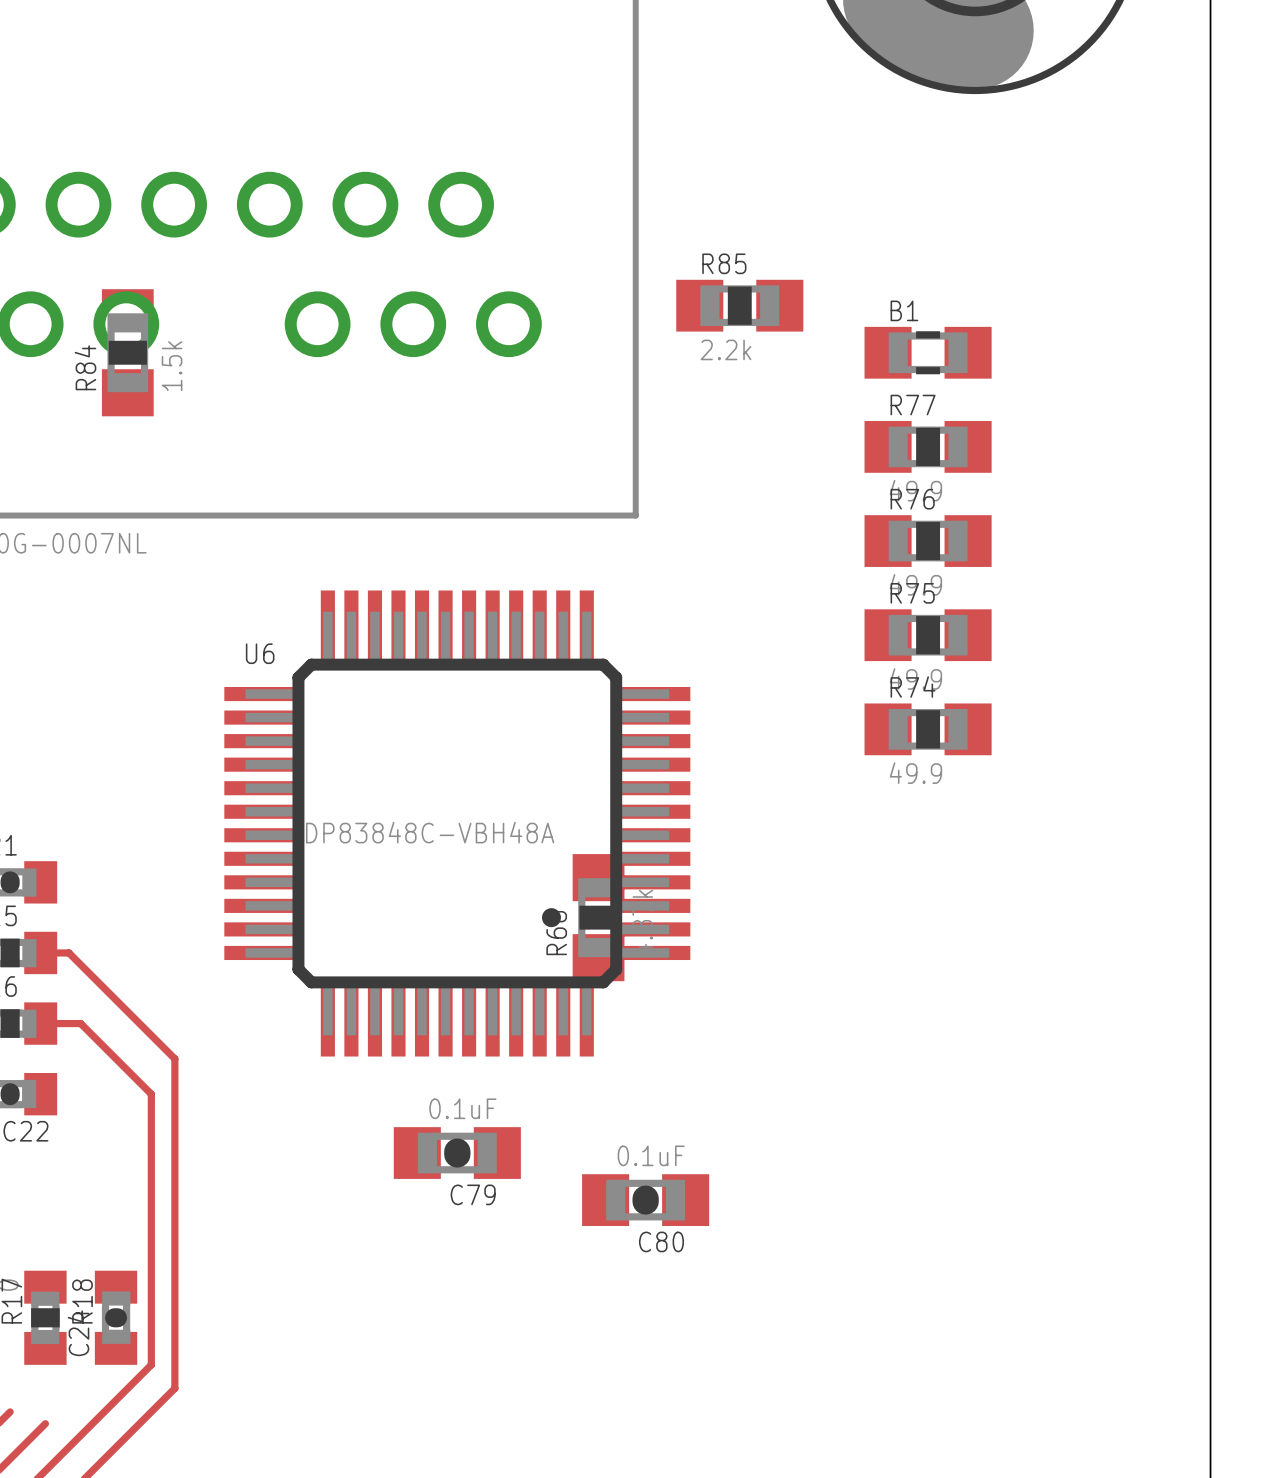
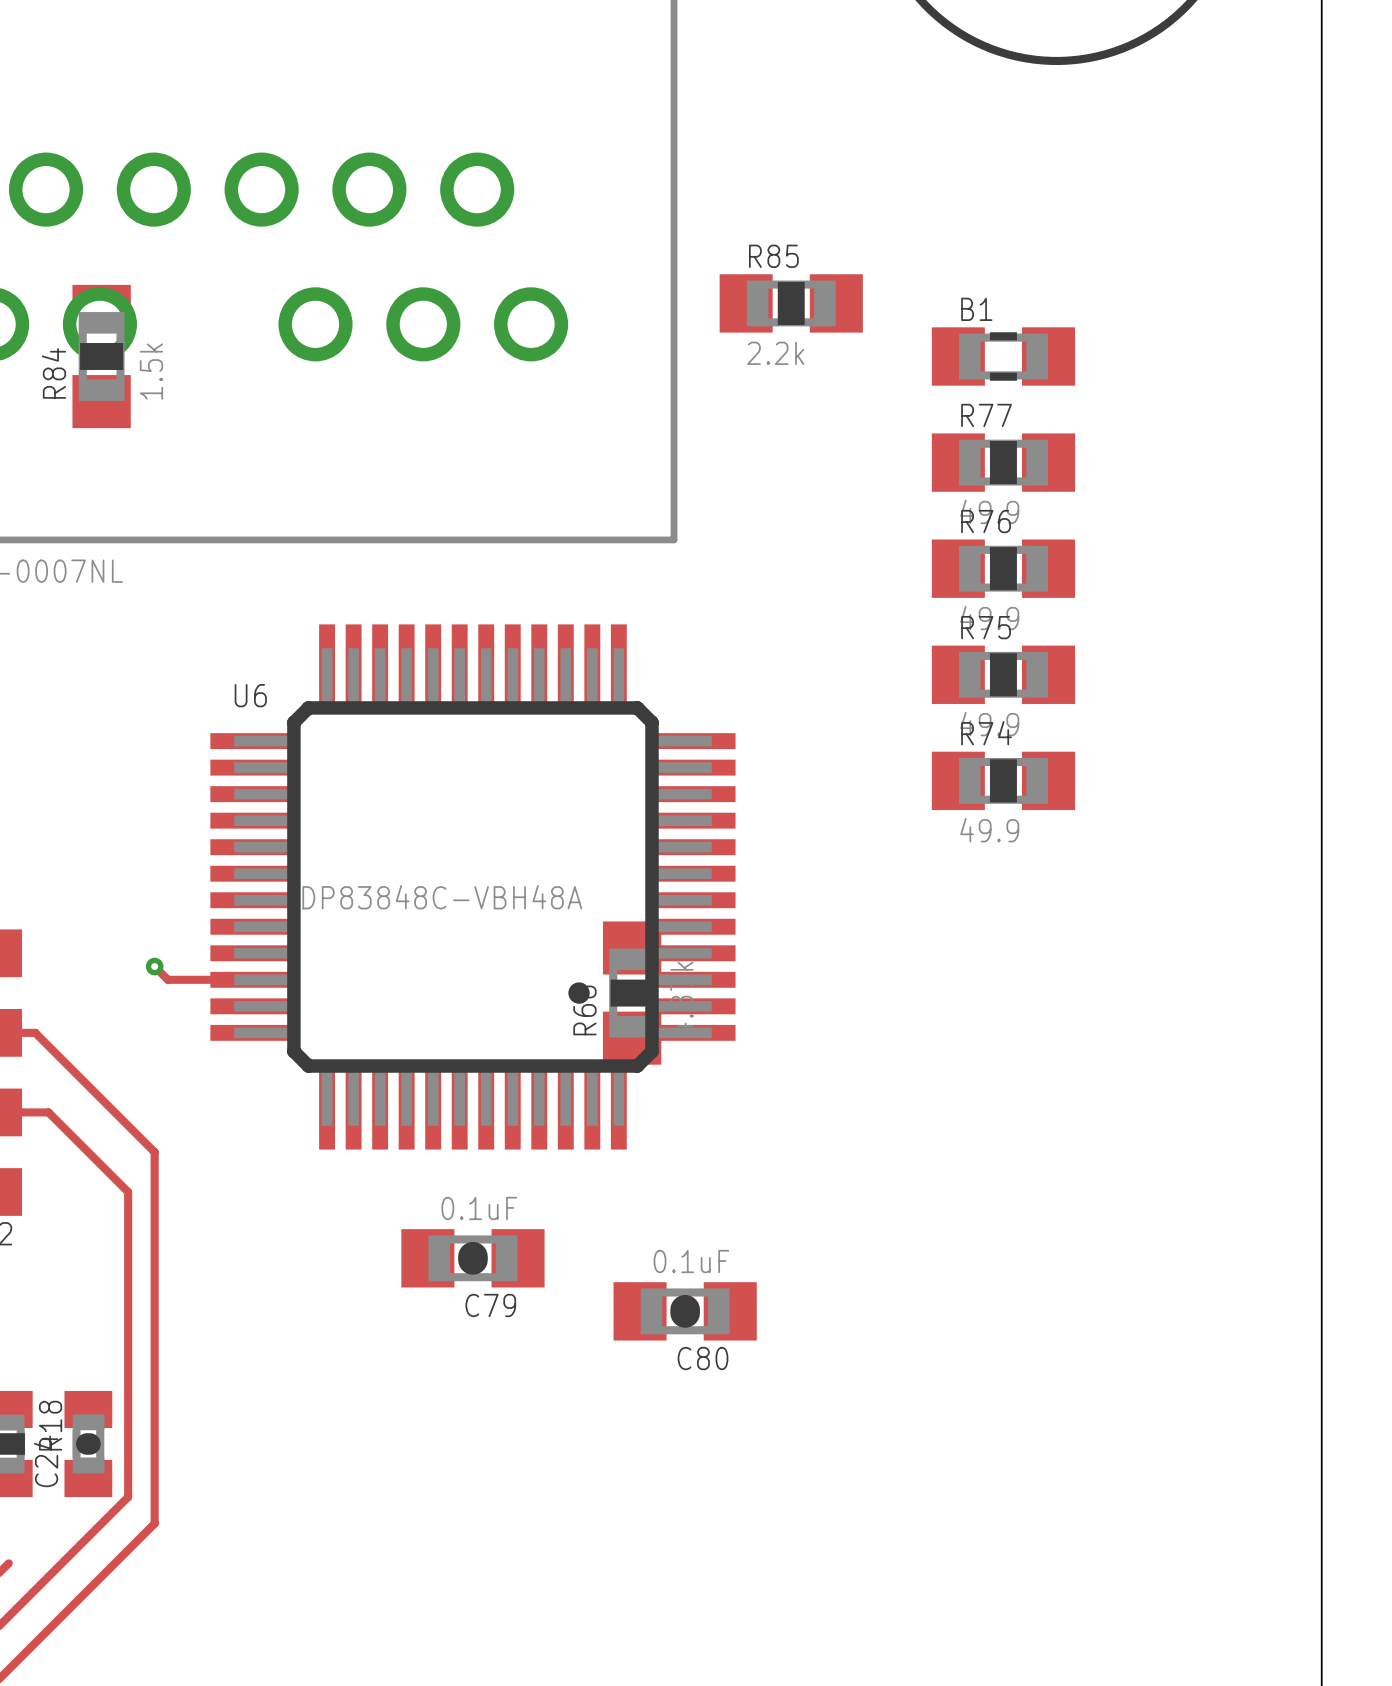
track: none -> (154, 966) (167, 979) (250, 979)
via: none -> (154, 966)

